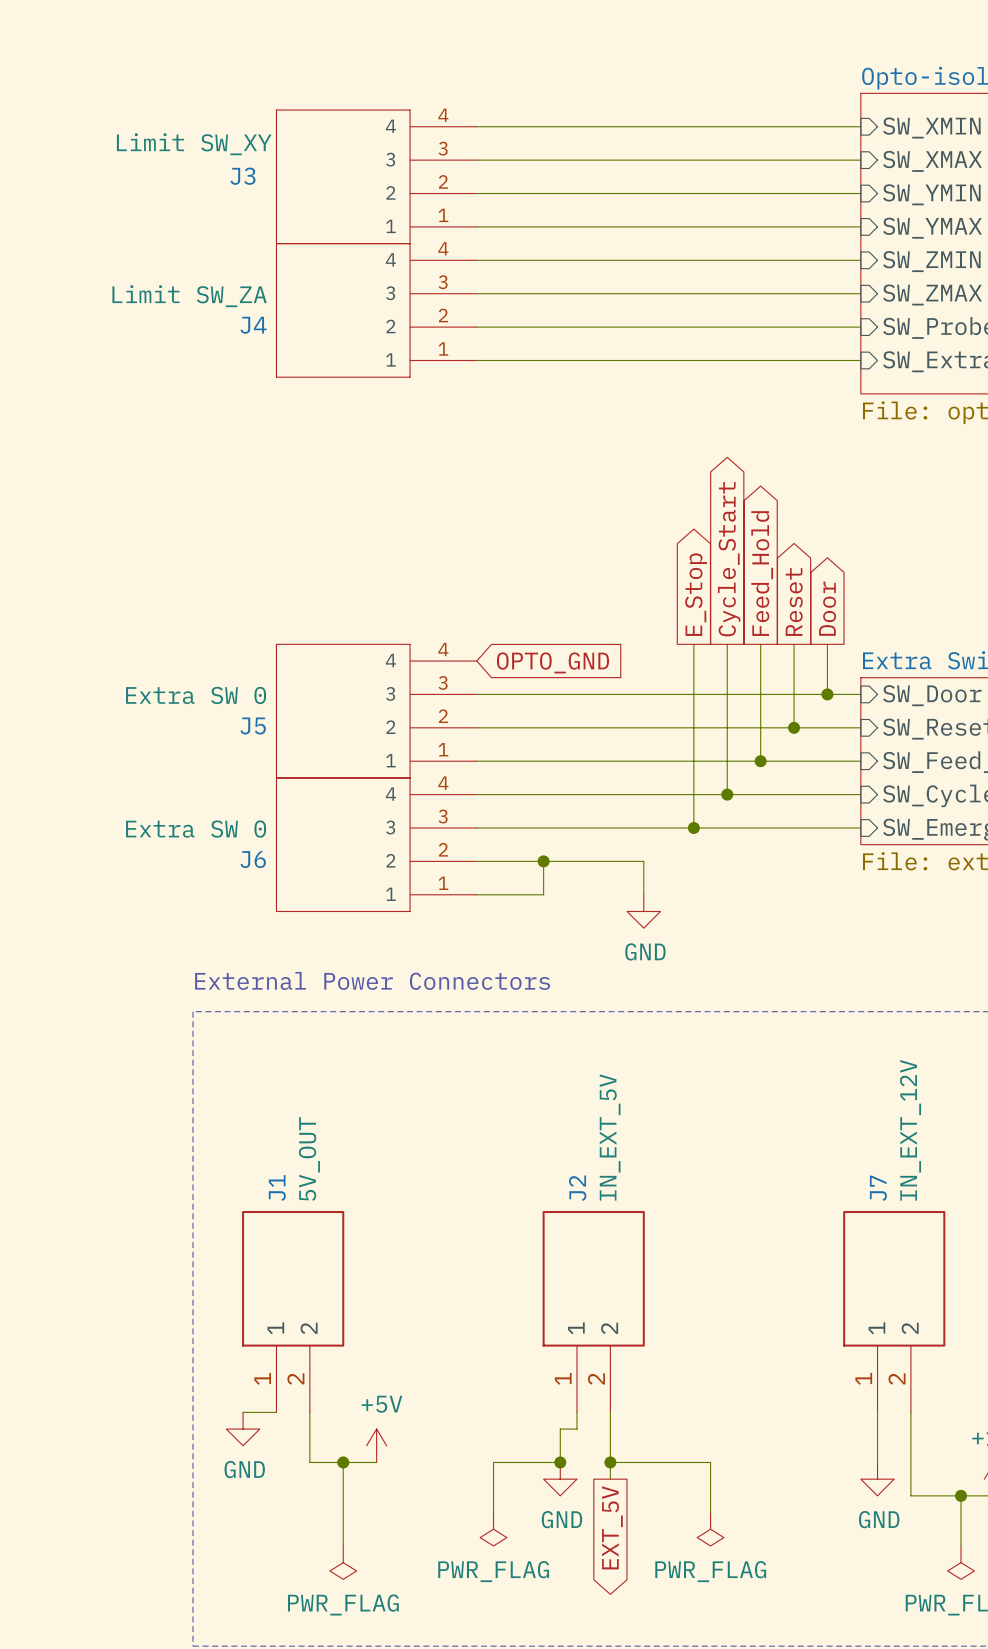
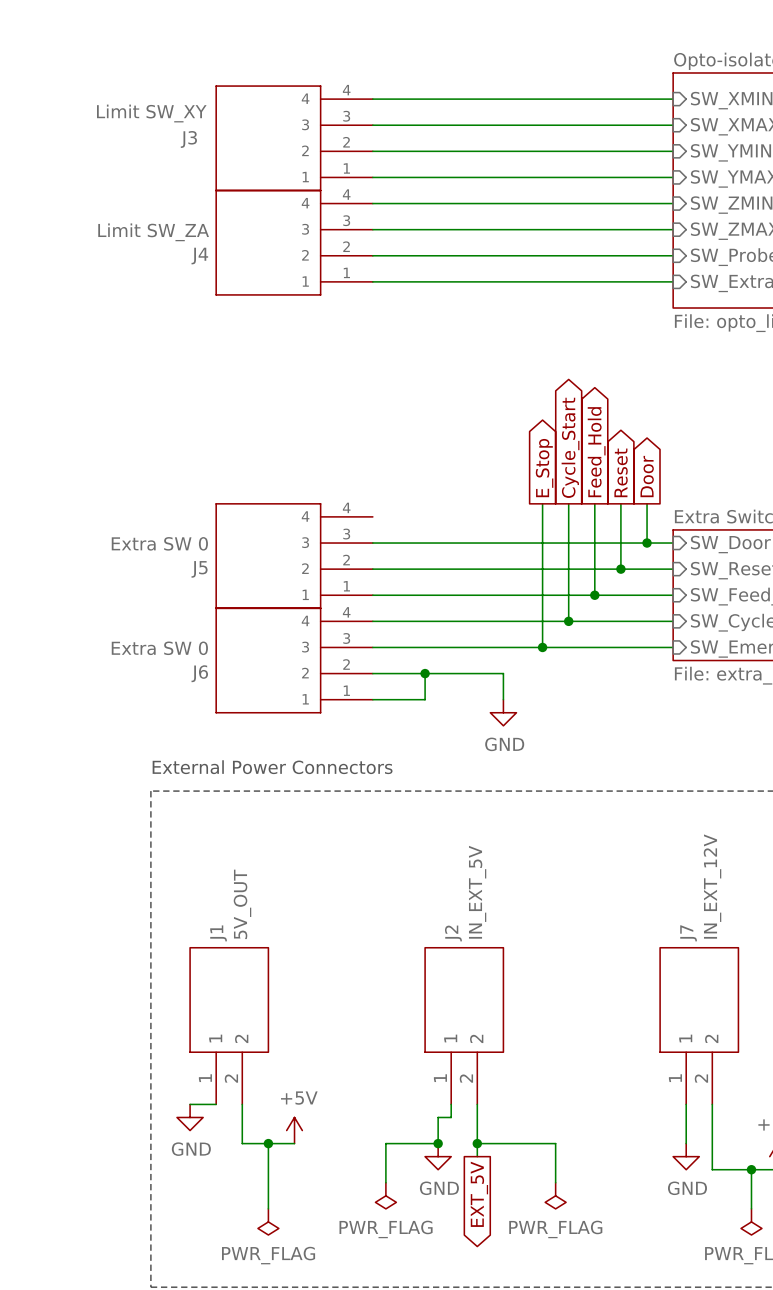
global label: OPTO_GND (553, 662) -> none

